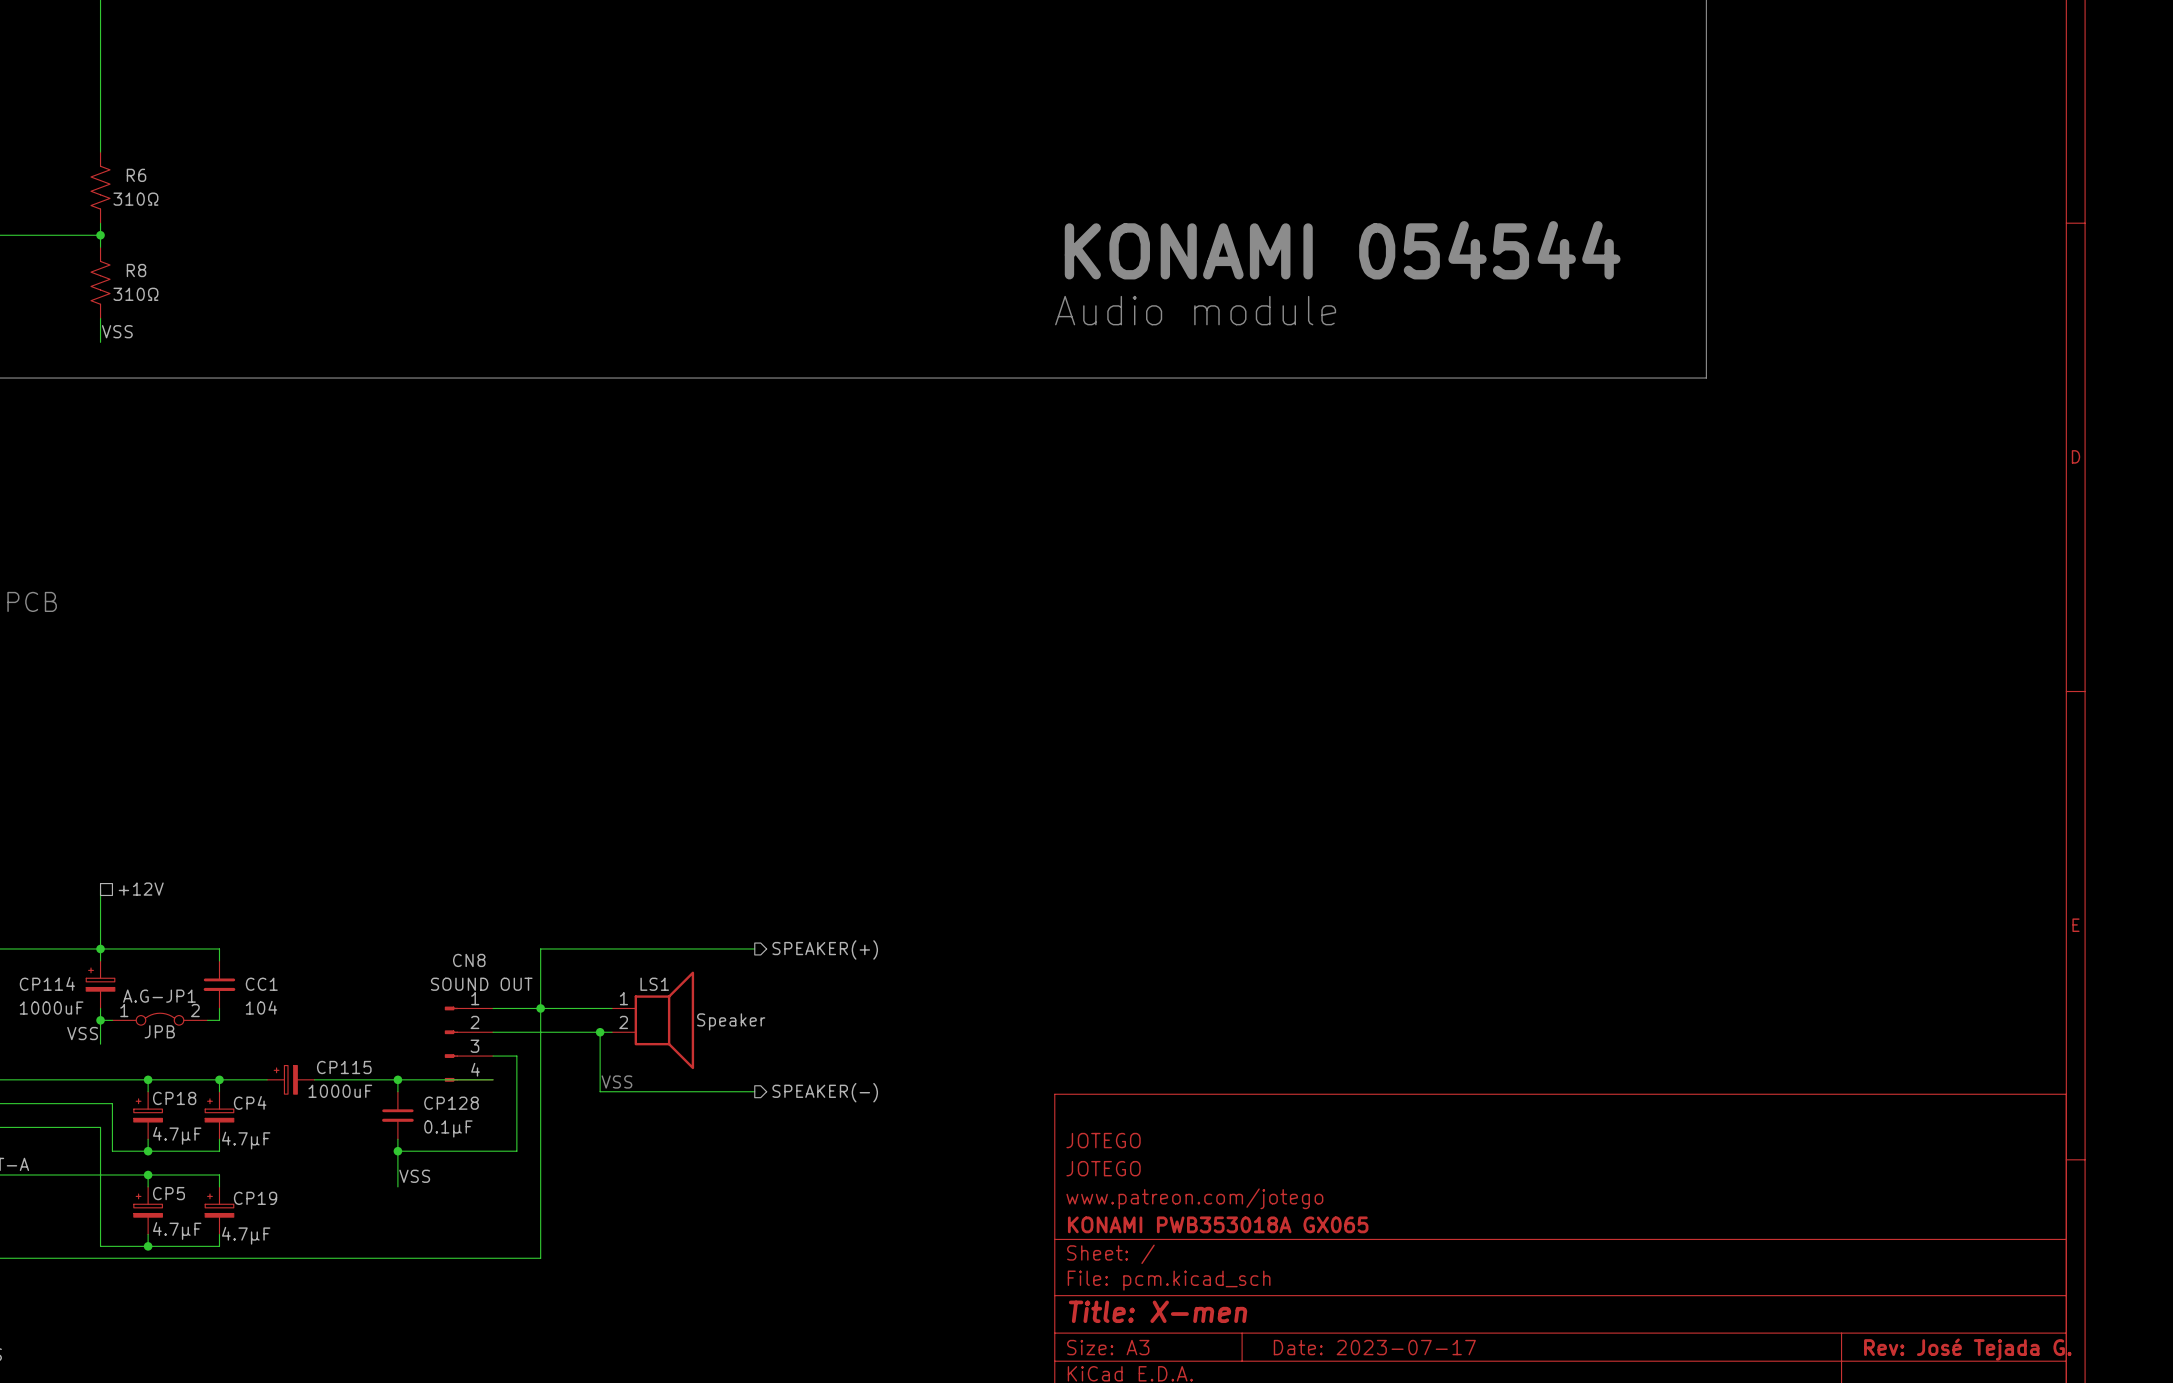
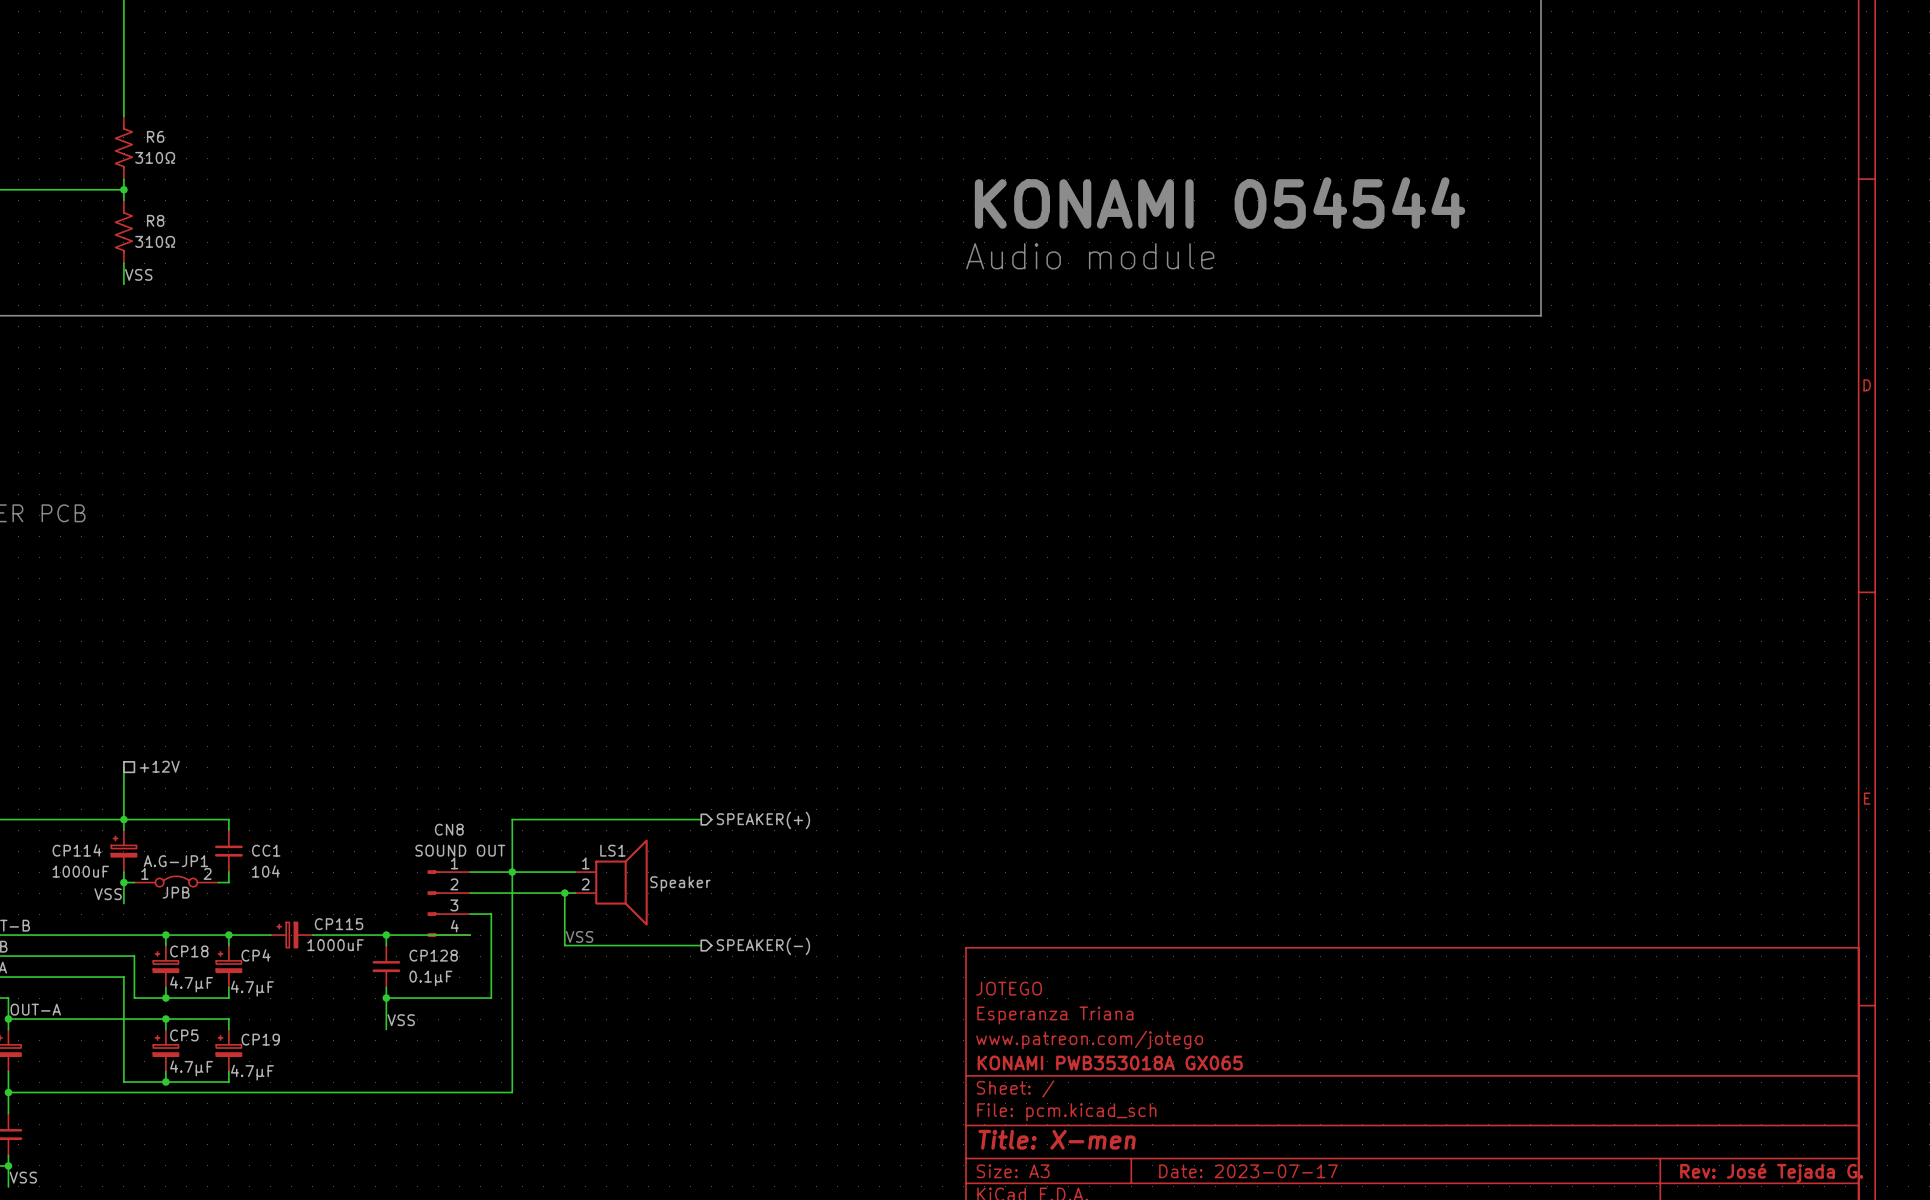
title block: JOTEGO (1103, 1168) -> Esperanza Triana (1055, 1015)

